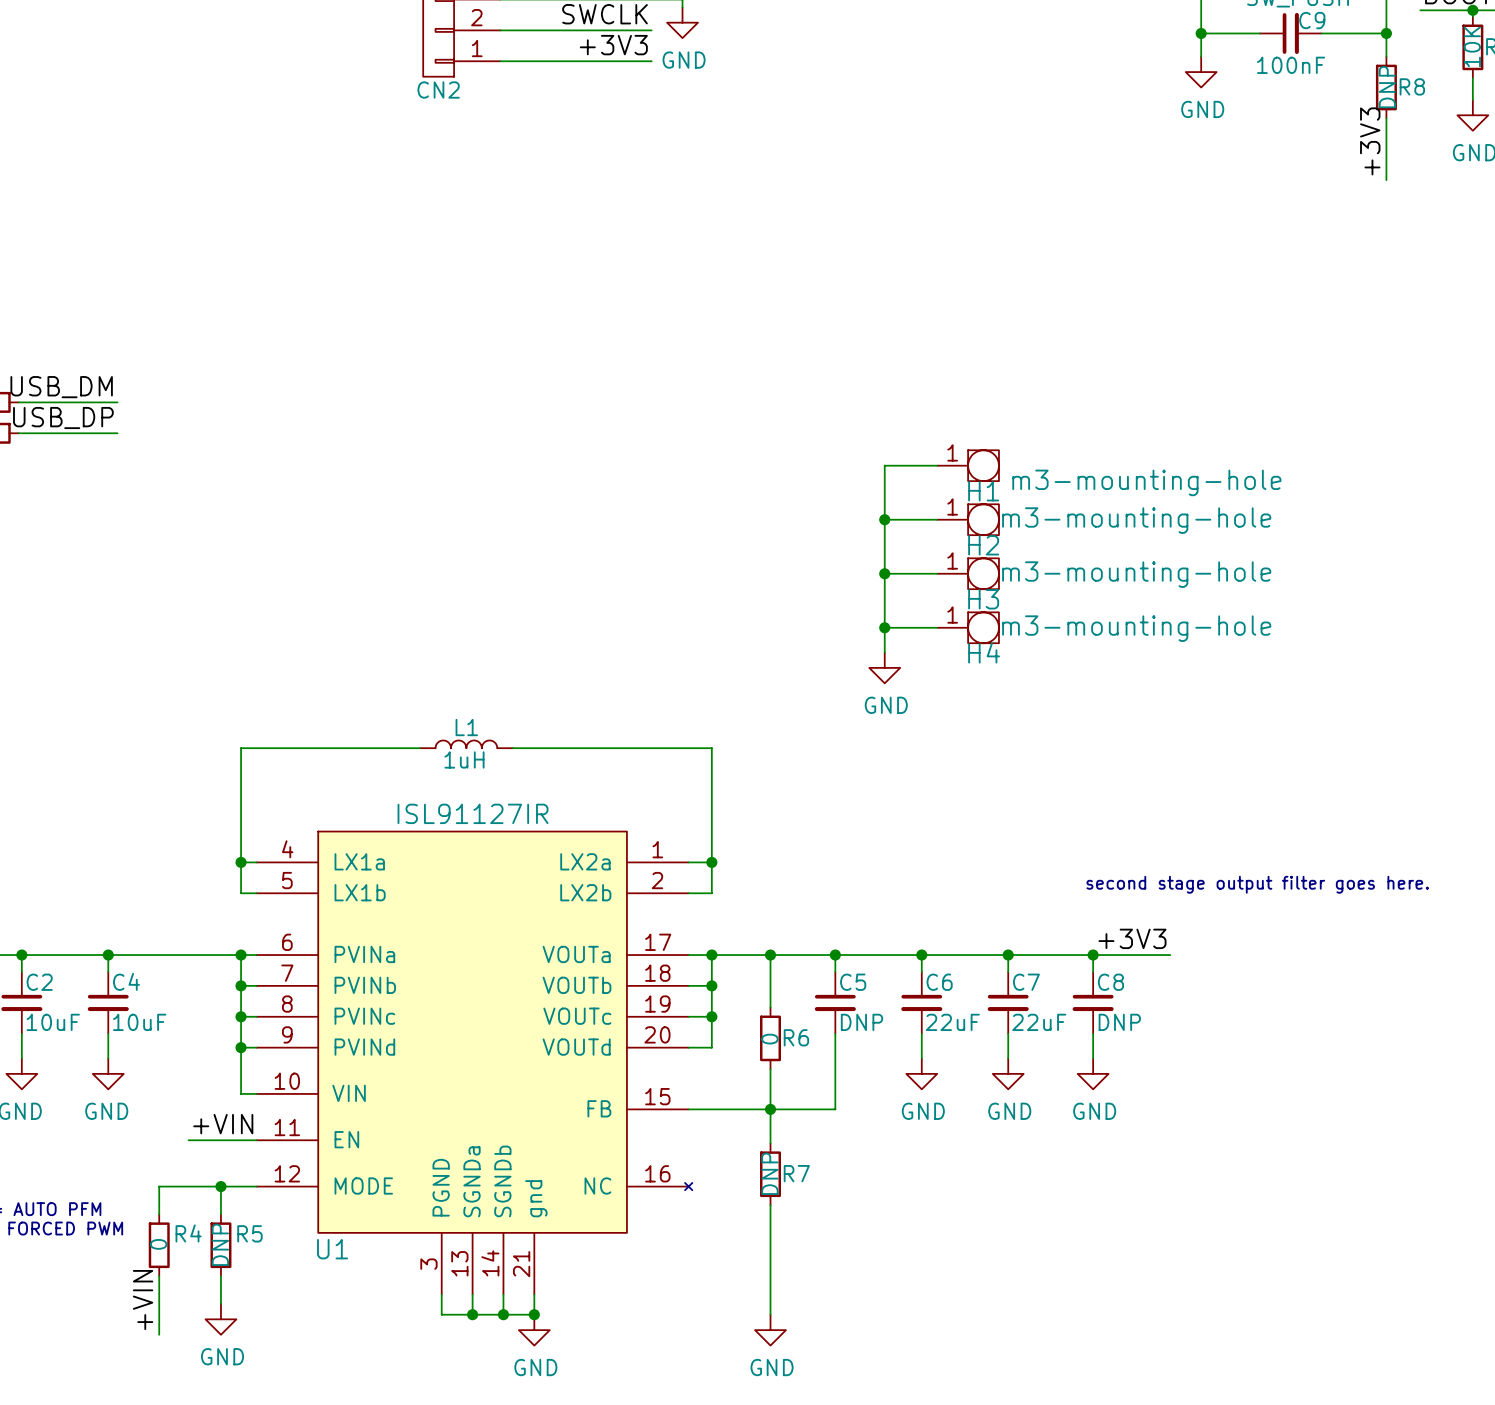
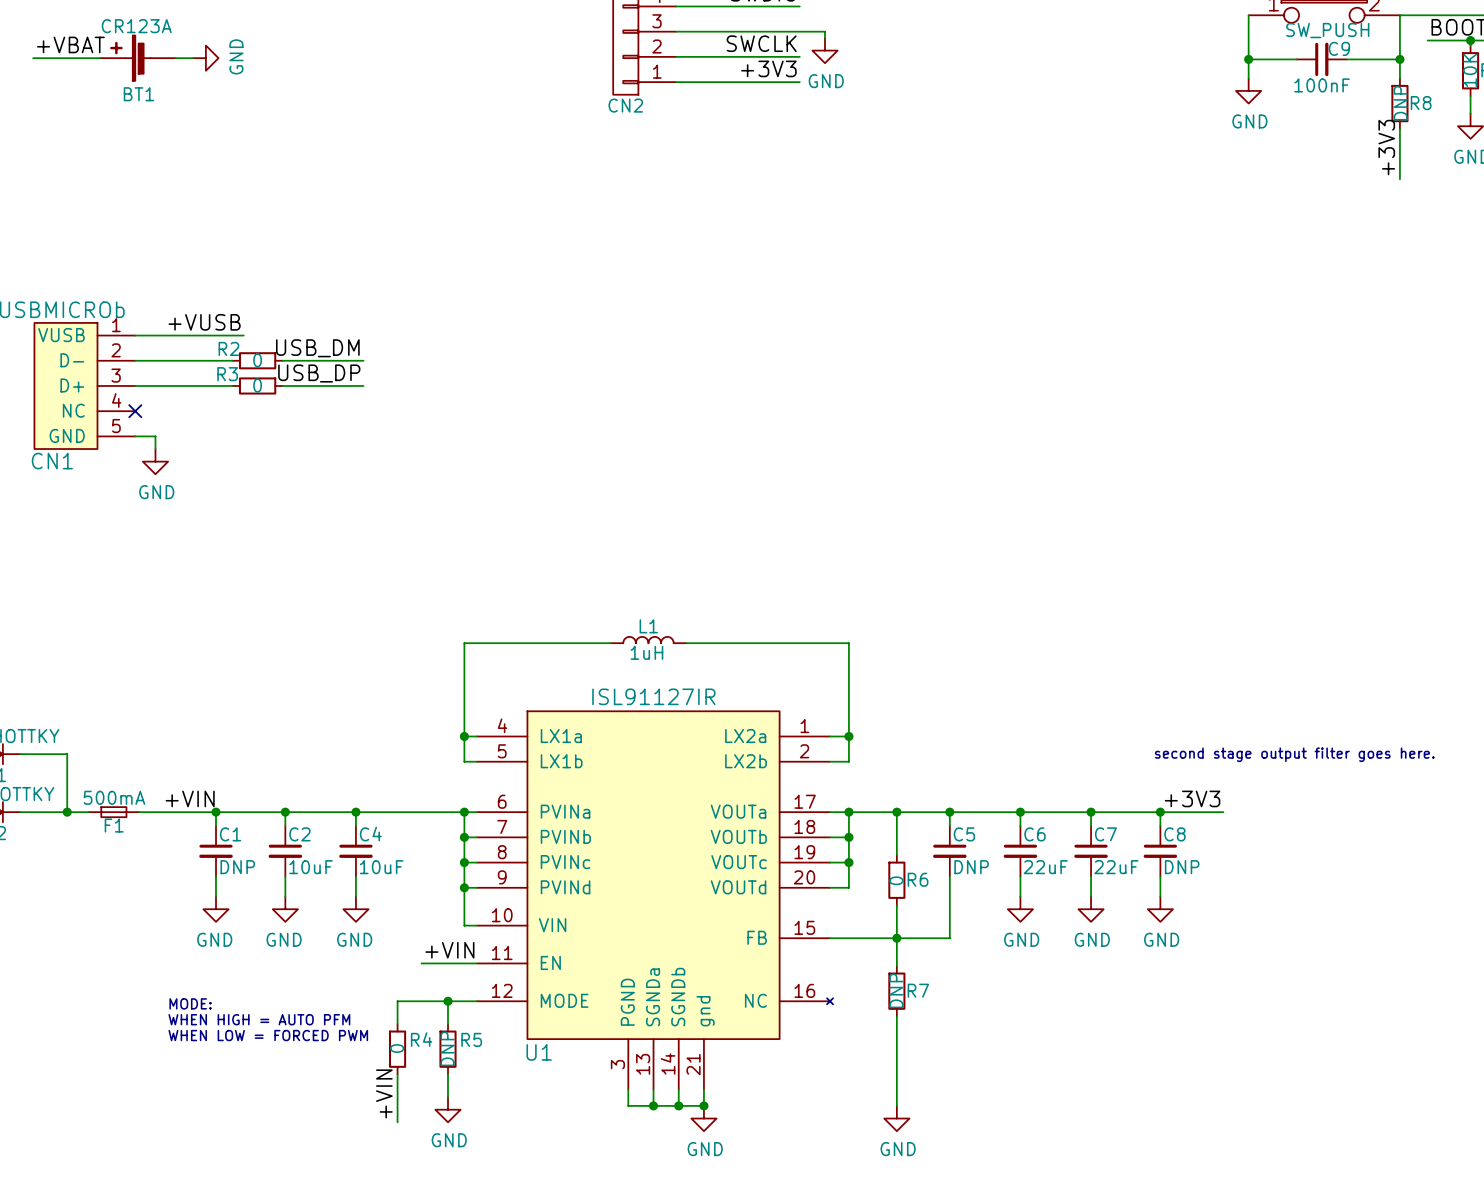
wire: (937, 465) (884, 465) (884, 652) -> none
H1: m3-mounting-hole (968, 465) -> none
wire: (884, 519) (937, 519) -> none
junction: (884, 519) -> none
H2: m3-mounting-hole (968, 519) -> none
wire: (884, 573) (937, 573) -> none
junction: (884, 573) -> none
H3: m3-mounting-hole (968, 573) -> none
wire: (884, 627) (937, 627) -> none
junction: (884, 627) -> none
H4: m3-mounting-hole (968, 627) -> none
power symbol: GND (884, 667) -> none

